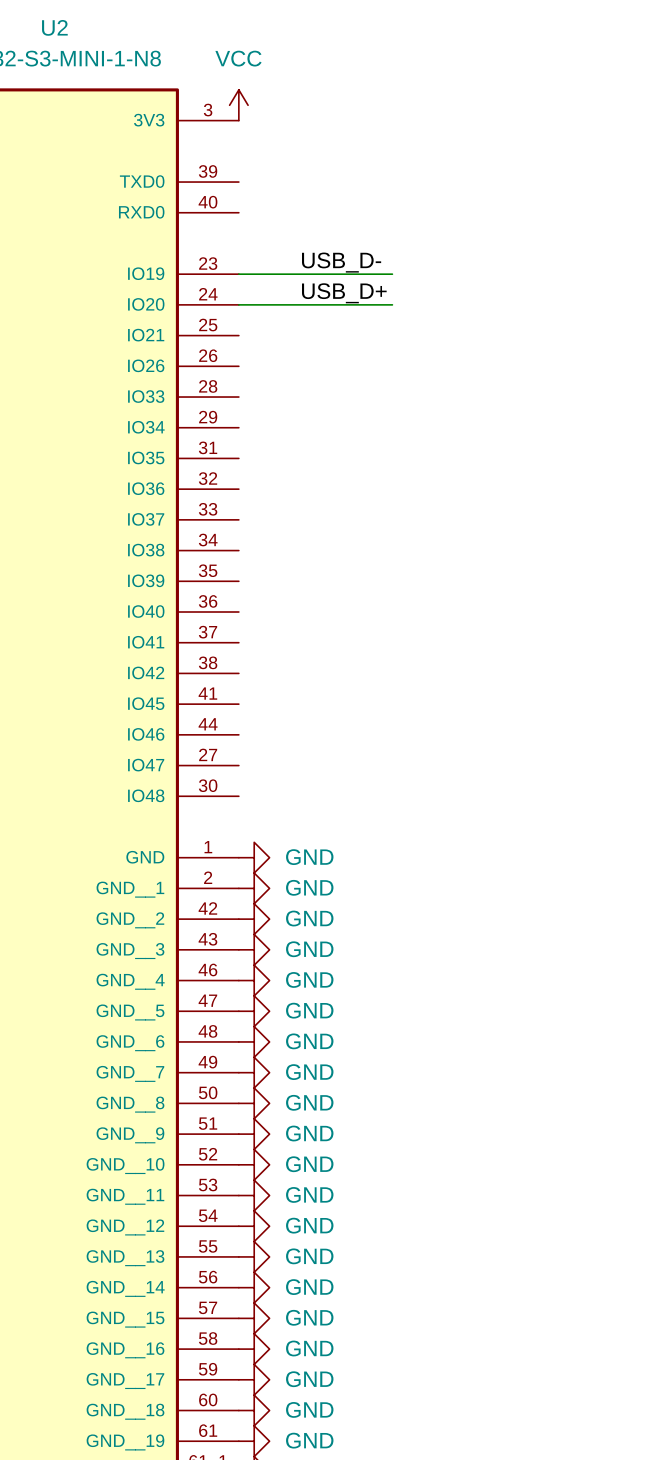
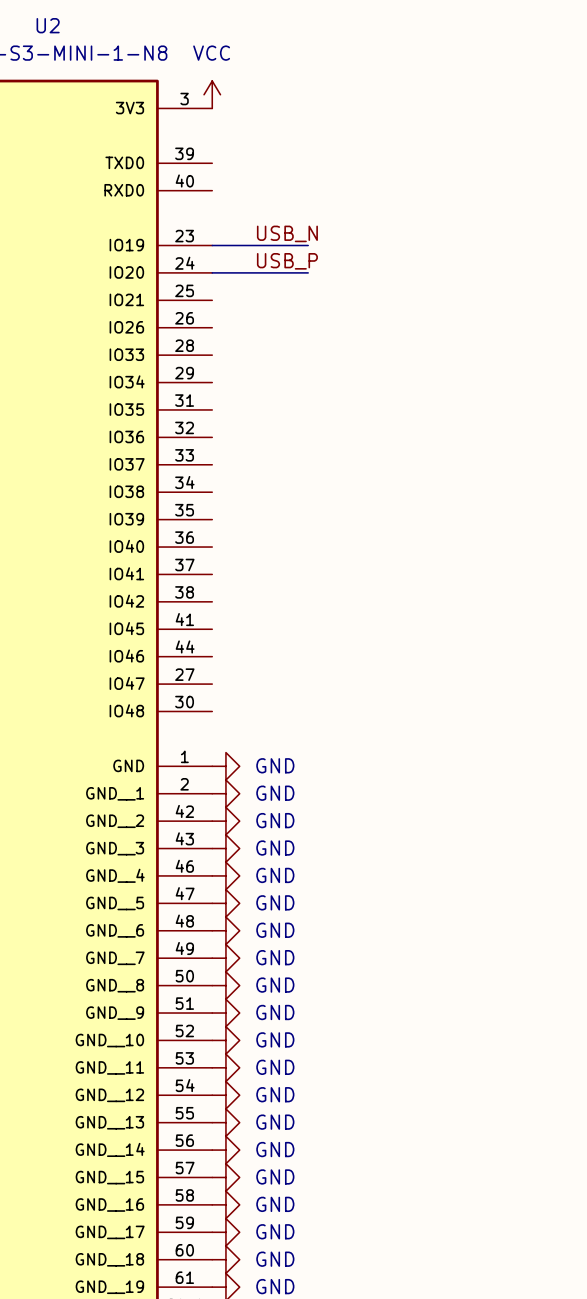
label: USB_D- (341, 262) -> USB_N (287, 233)
wire: (346, 274) (392, 274) -> none
label: USB_D+ (344, 293) -> USB_P (287, 261)
wire: (346, 304) (392, 304) -> none

